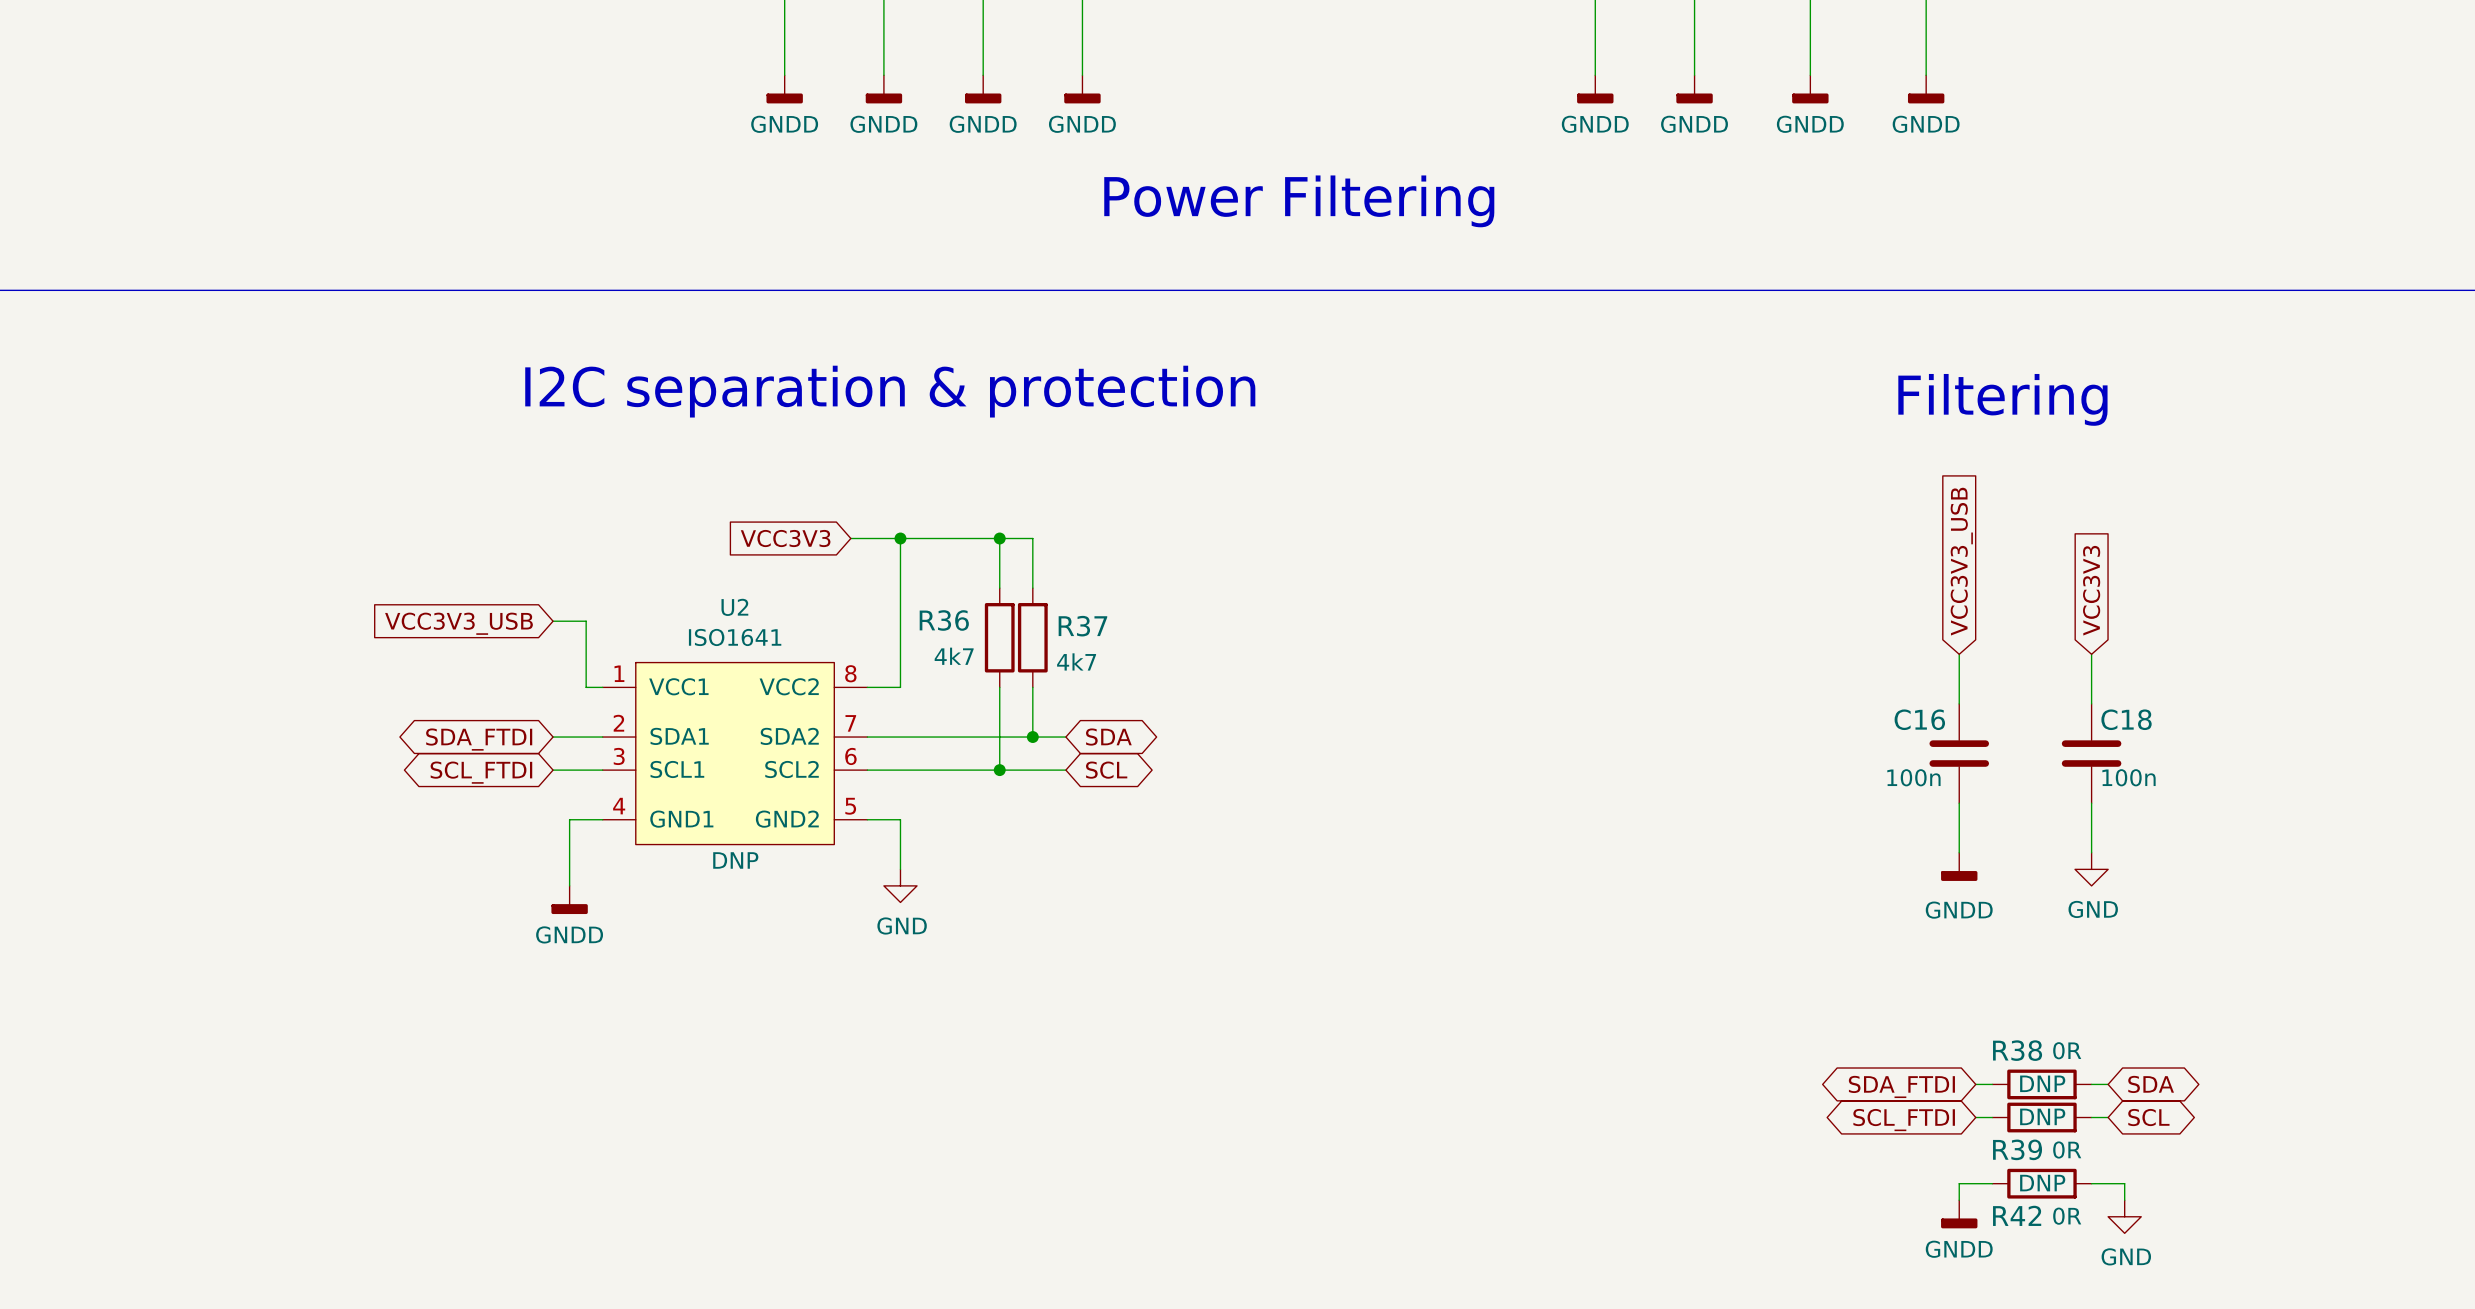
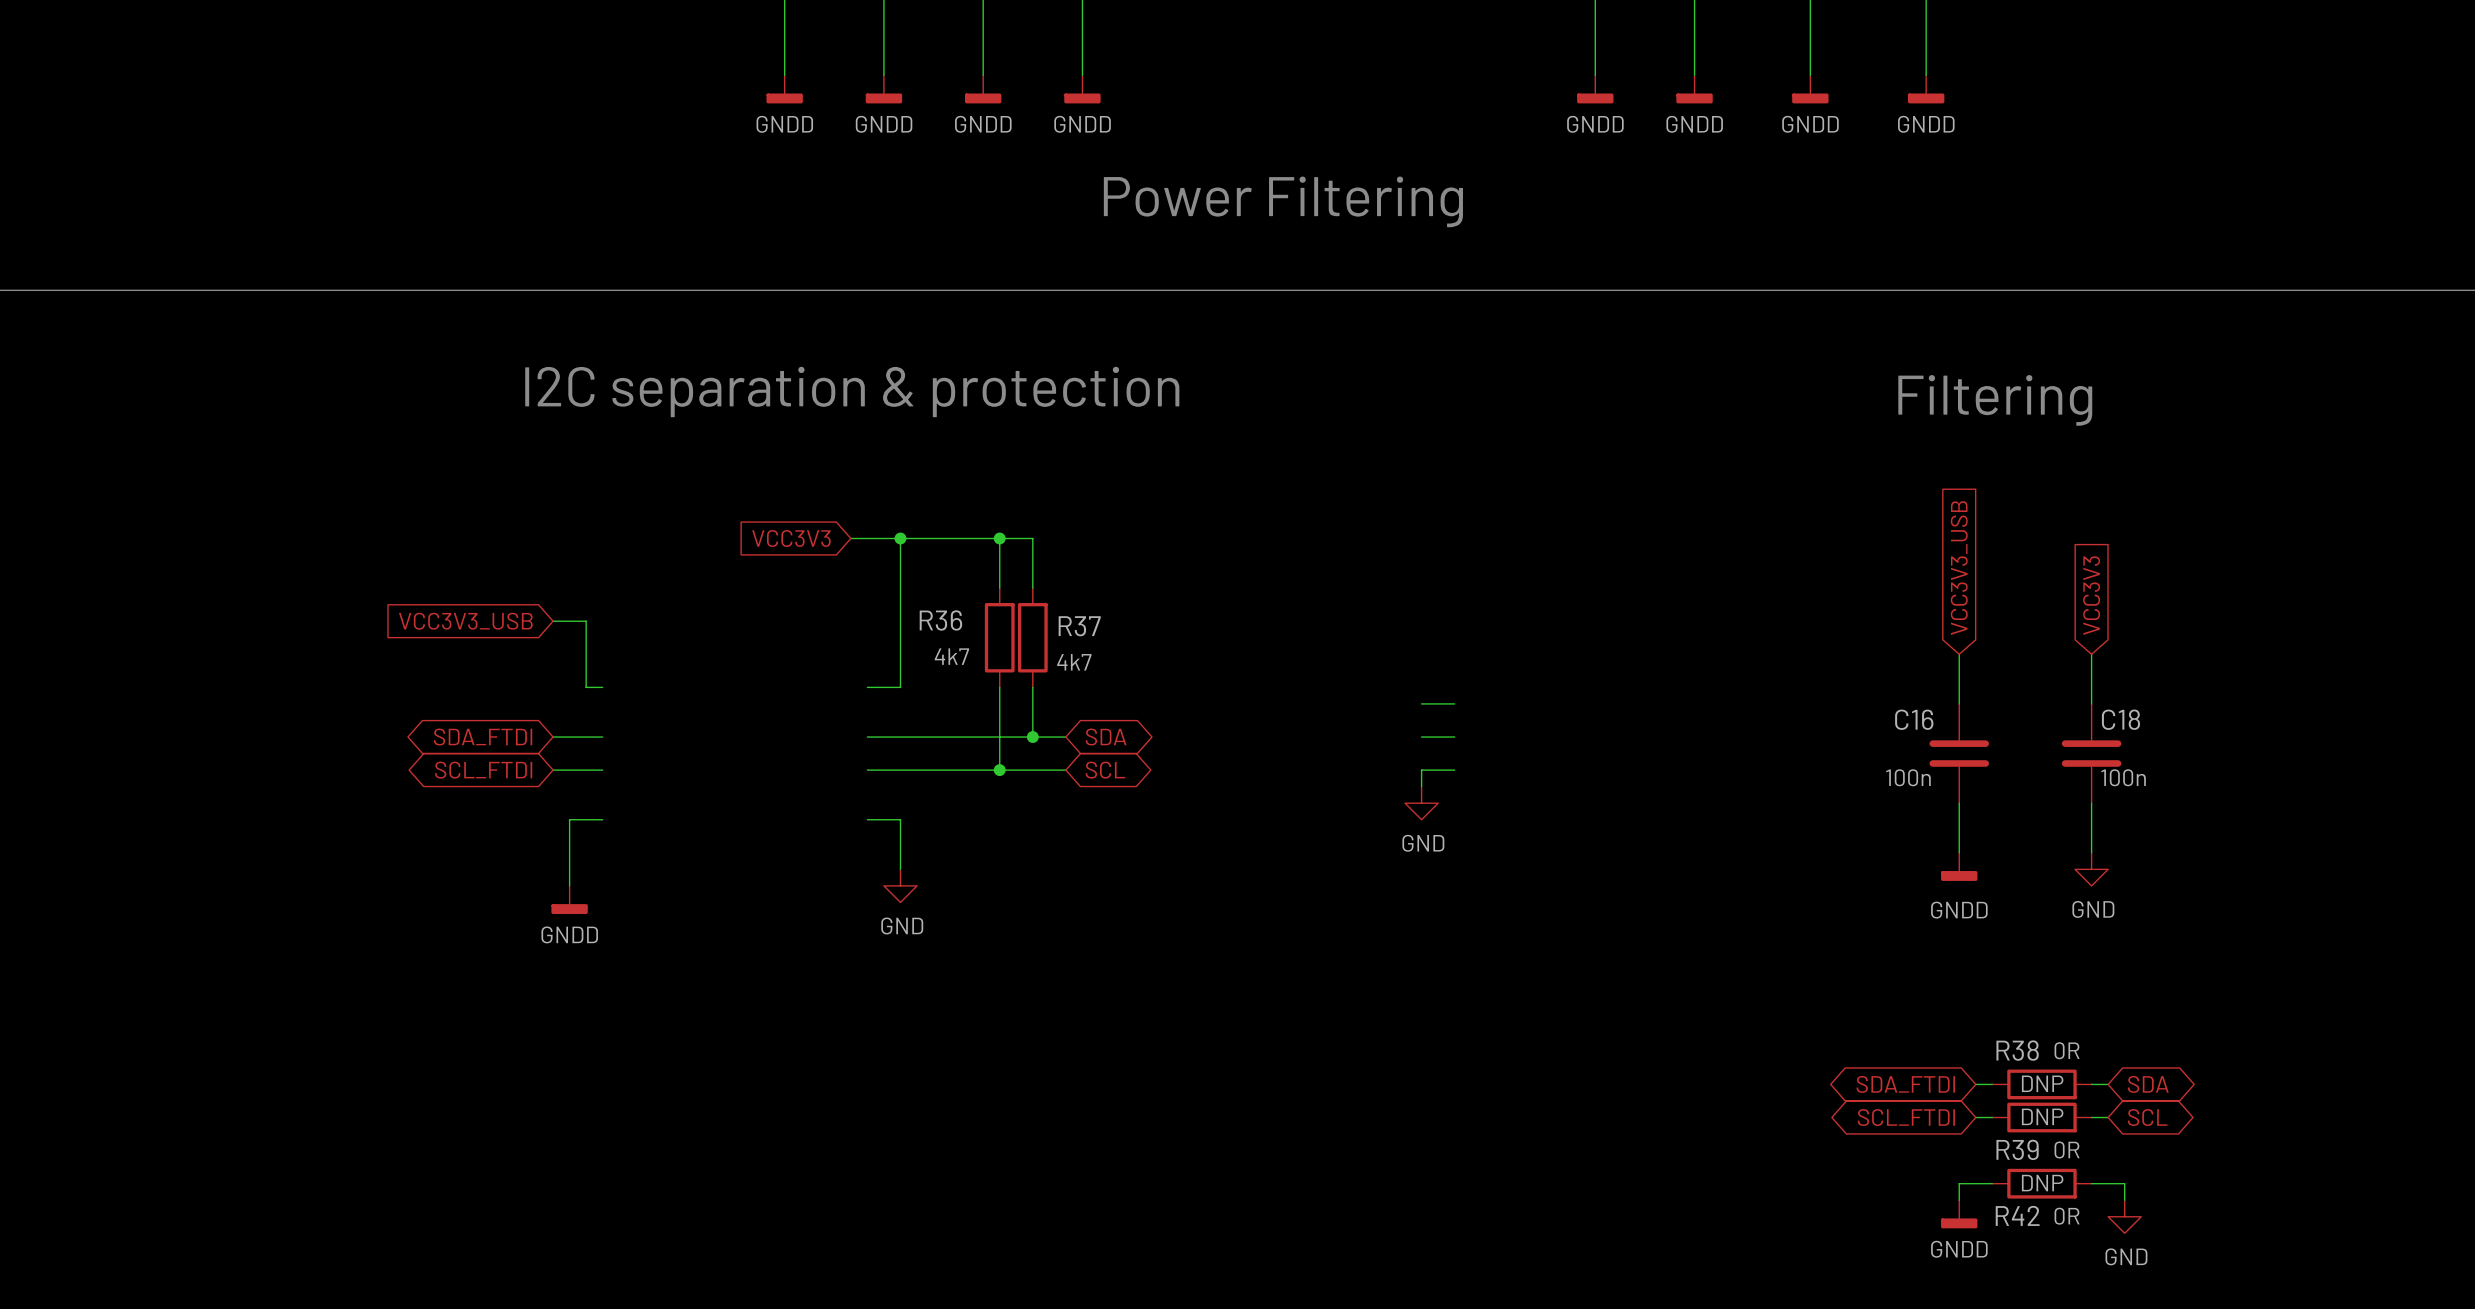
wire: none -> (1421, 703) (1454, 703)
wire: none -> (1421, 737) (1454, 737)
U2: ISO1641 (735, 753) -> none
wire: none -> (1454, 770) (1421, 770) (1421, 786)
power symbol: none -> GND (1421, 803)

